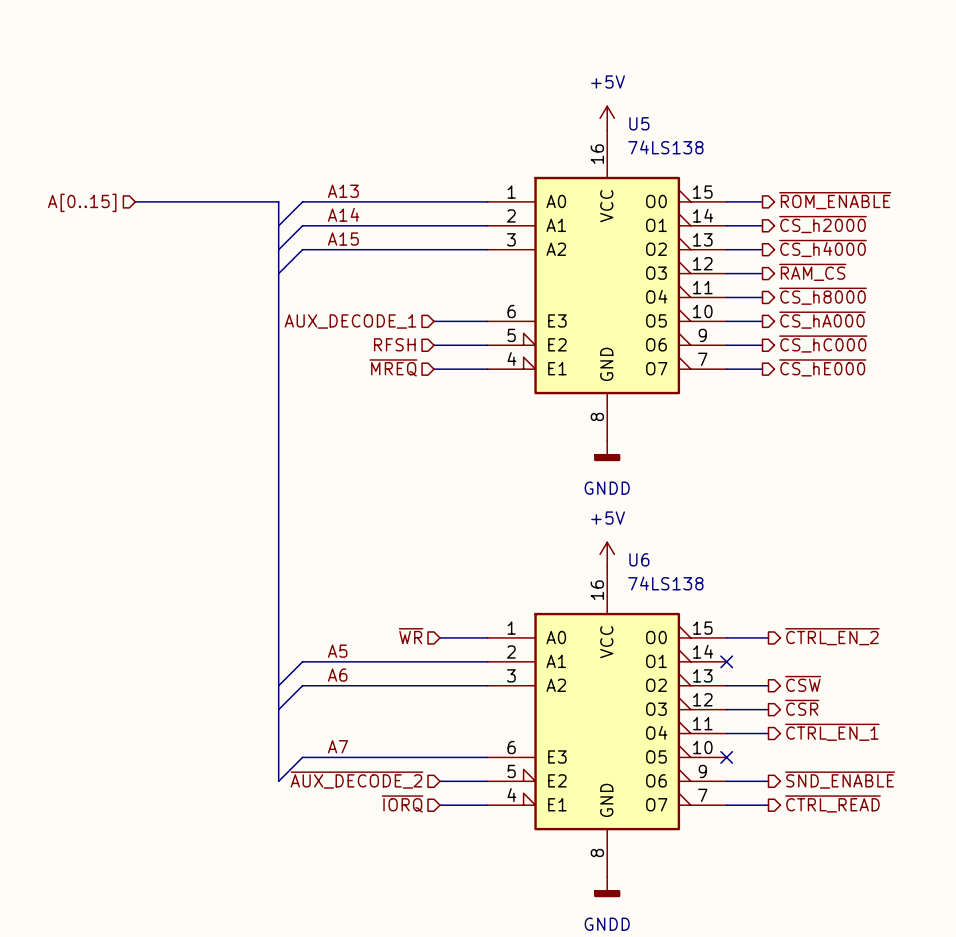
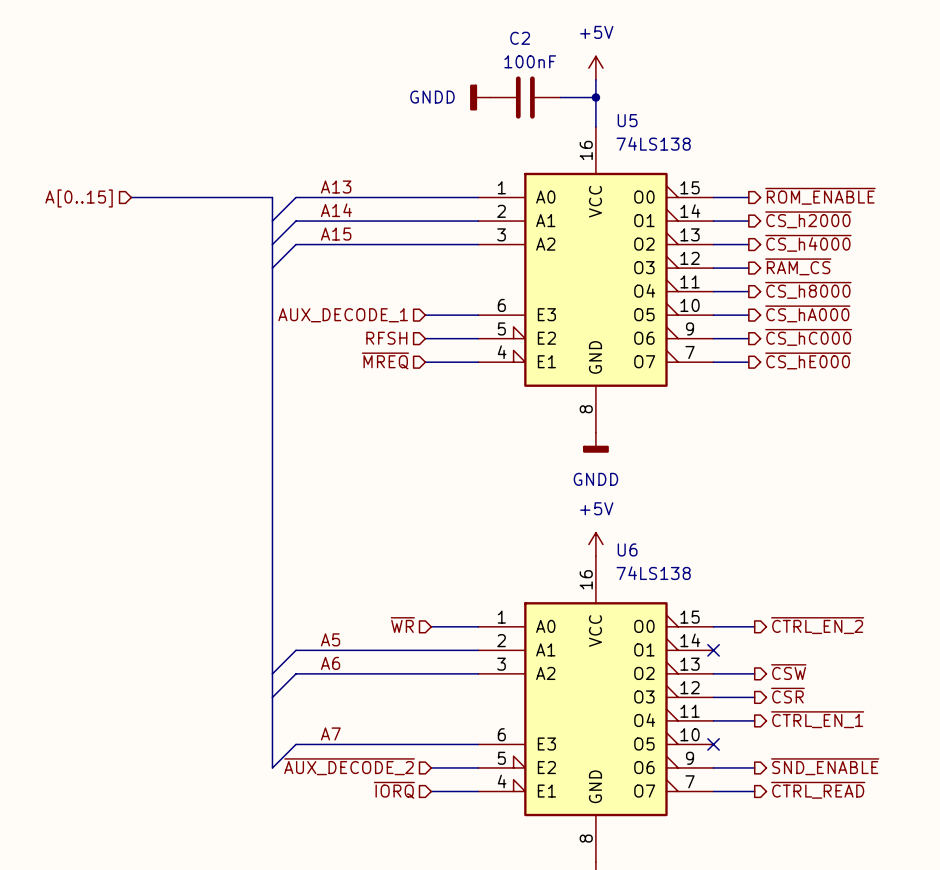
power symbol: none -> GNDD (480, 97)
C2: none -> 100nF (525, 97)
wire: none -> (560, 97) (595, 97)
junction: none -> (595, 97)
power symbol position: +5V (607, 118) -> +5V (595, 68)

